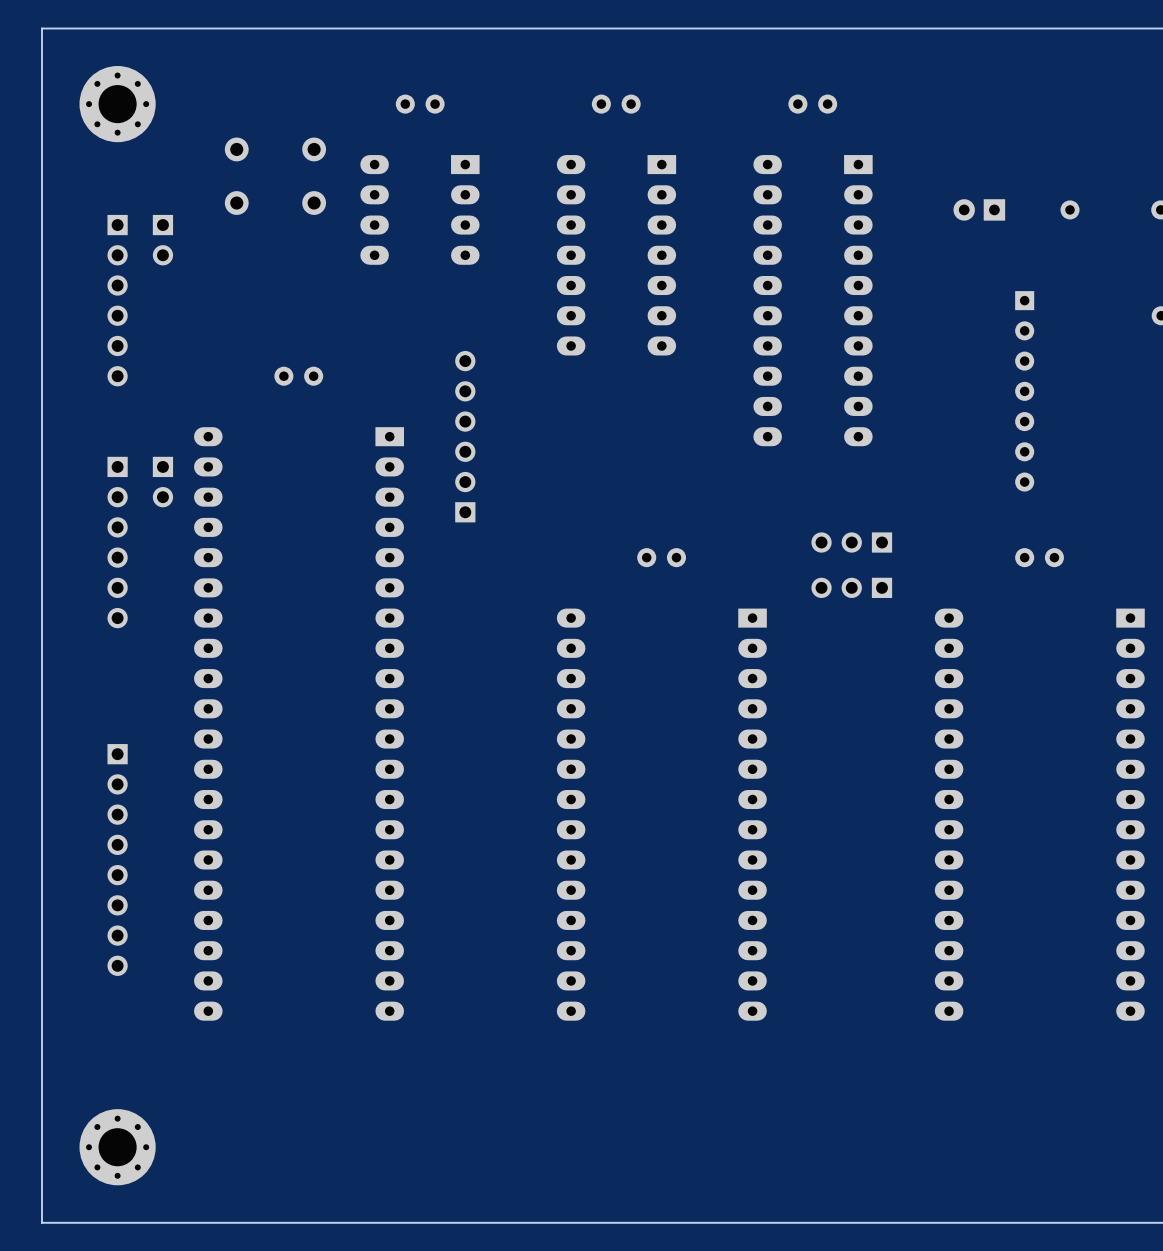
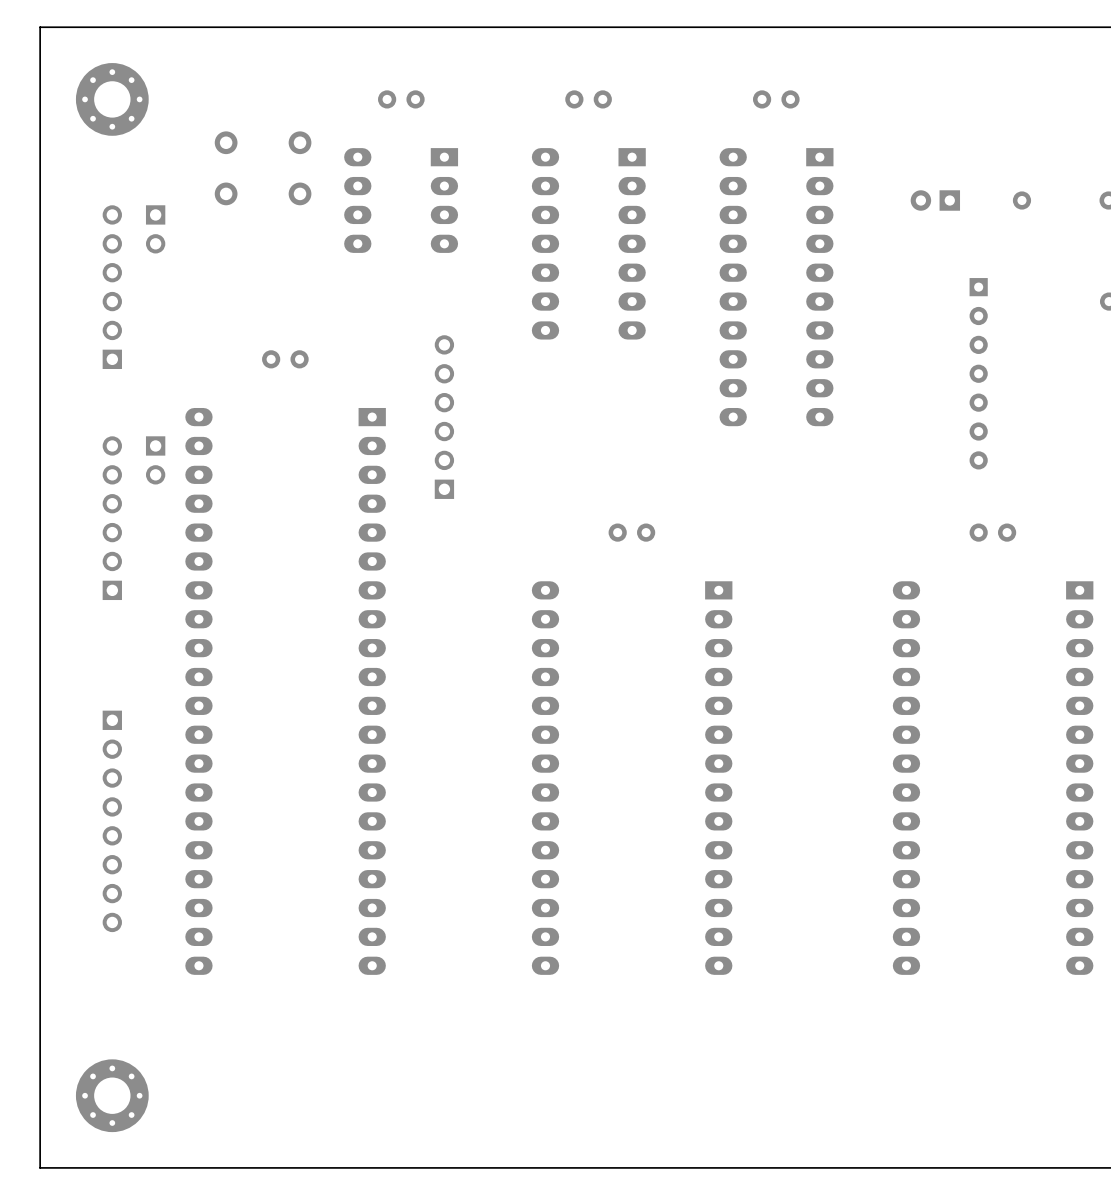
part rotation: 0° (117, 300) -> 180° (112, 287)
part rotation: 0° (117, 542) -> 180° (112, 518)
part: (851, 542) -> none
part: (851, 587) -> none

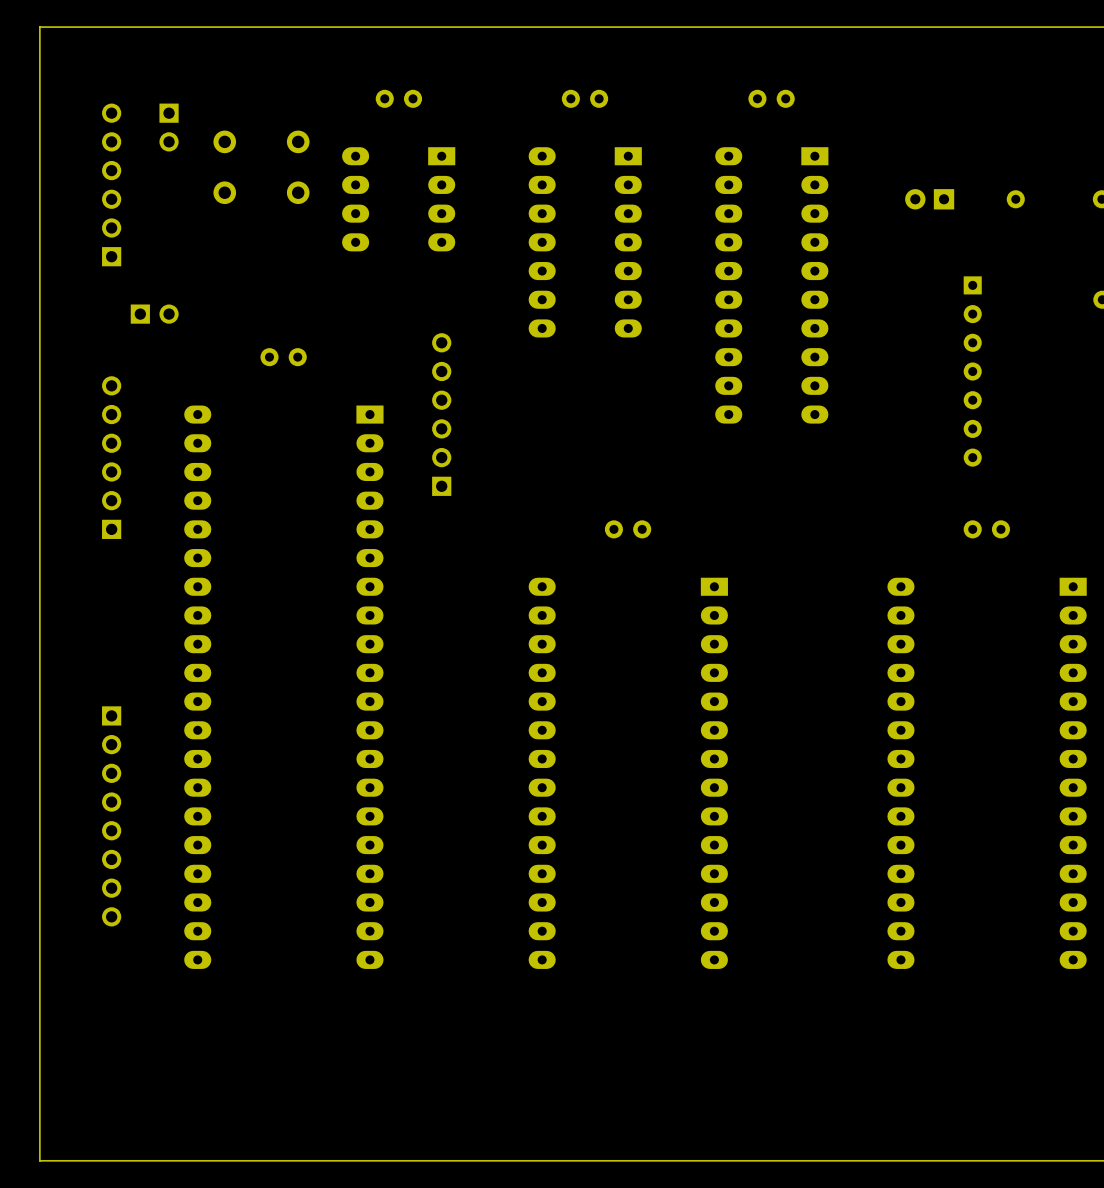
part: (112, 99) -> none
part: none -> (169, 127)
part: none -> (111, 184)
part: (155, 229) -> none
part: (112, 287) -> none
part: none -> (154, 314)
part: (155, 460) -> none
part position: (112, 518) -> (111, 457)
part: (112, 1095) -> none

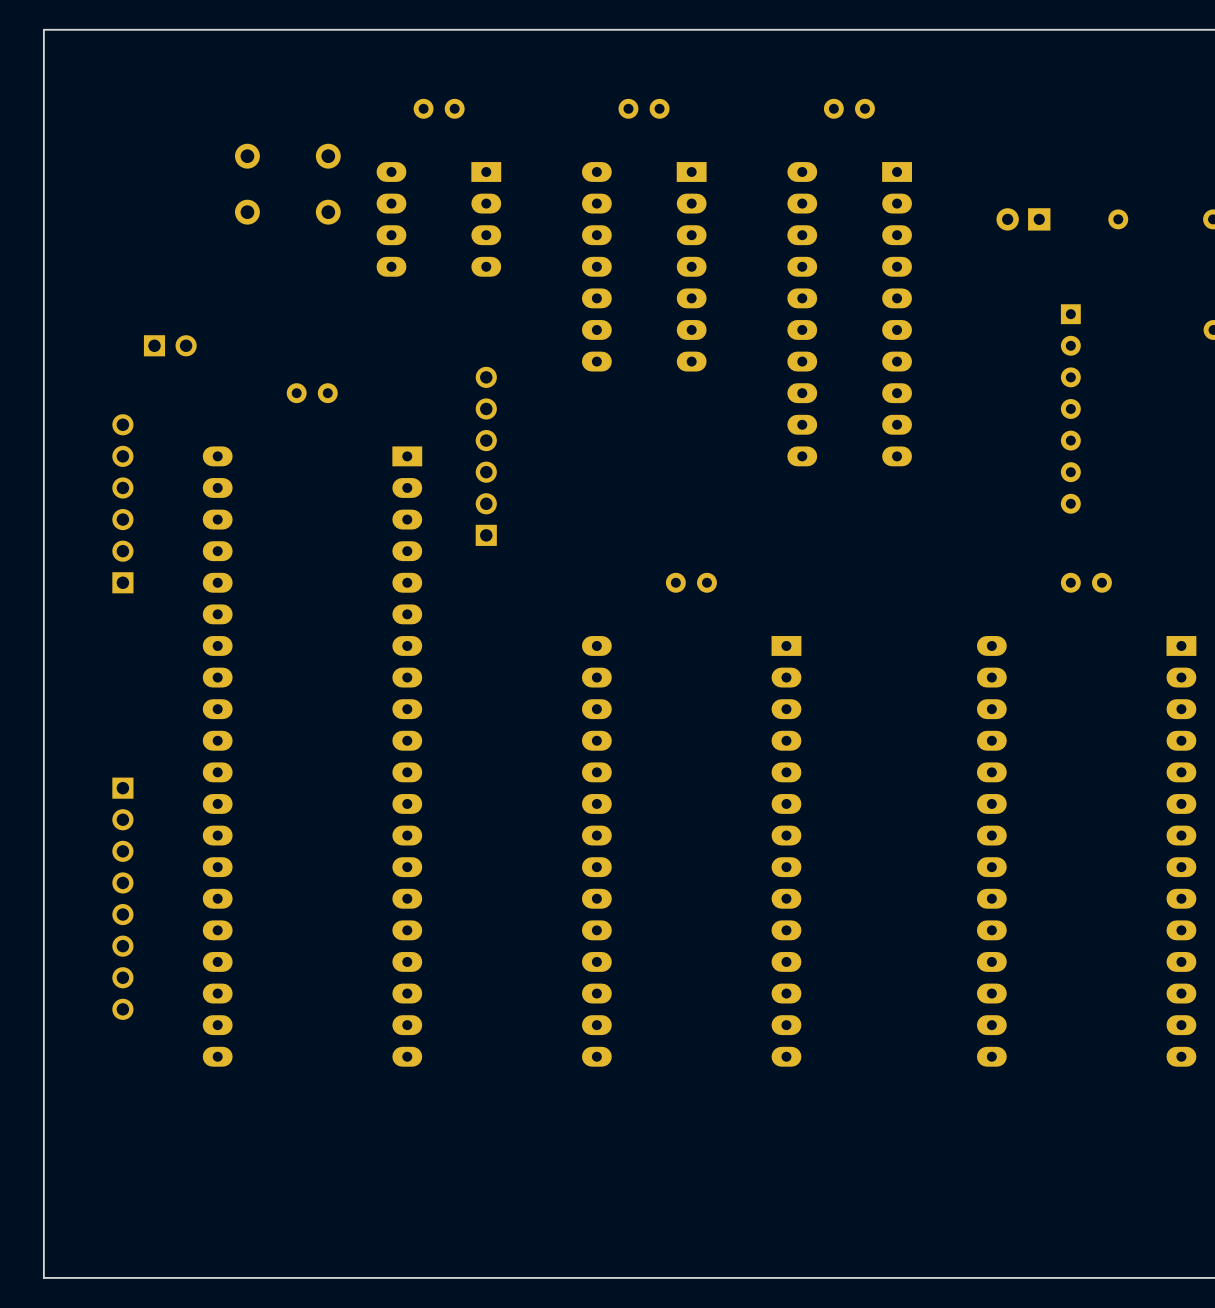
part: (169, 127) -> none
part: (111, 184) -> none

